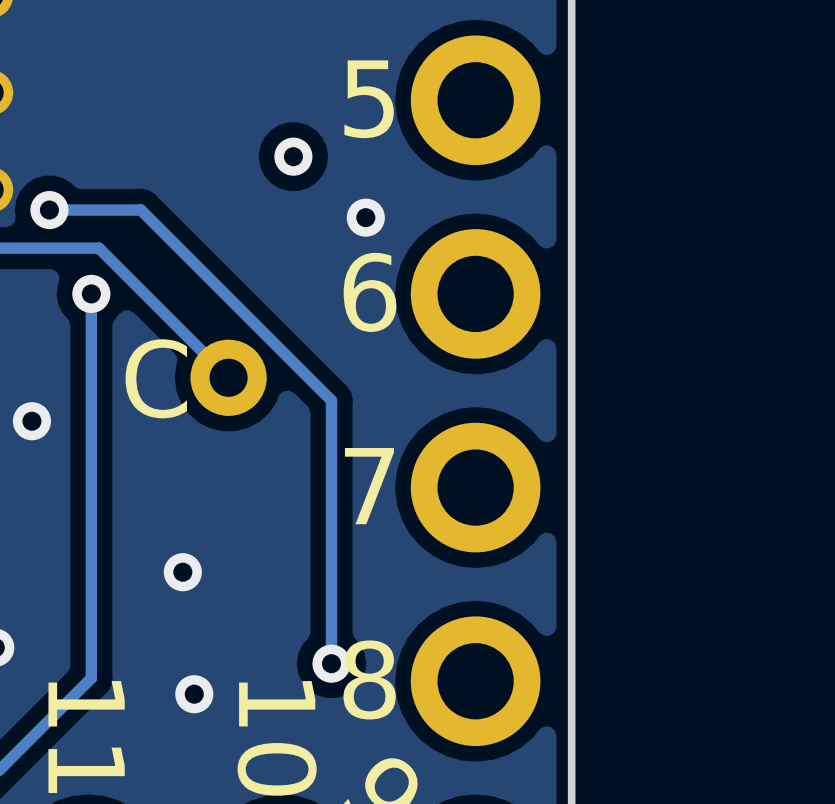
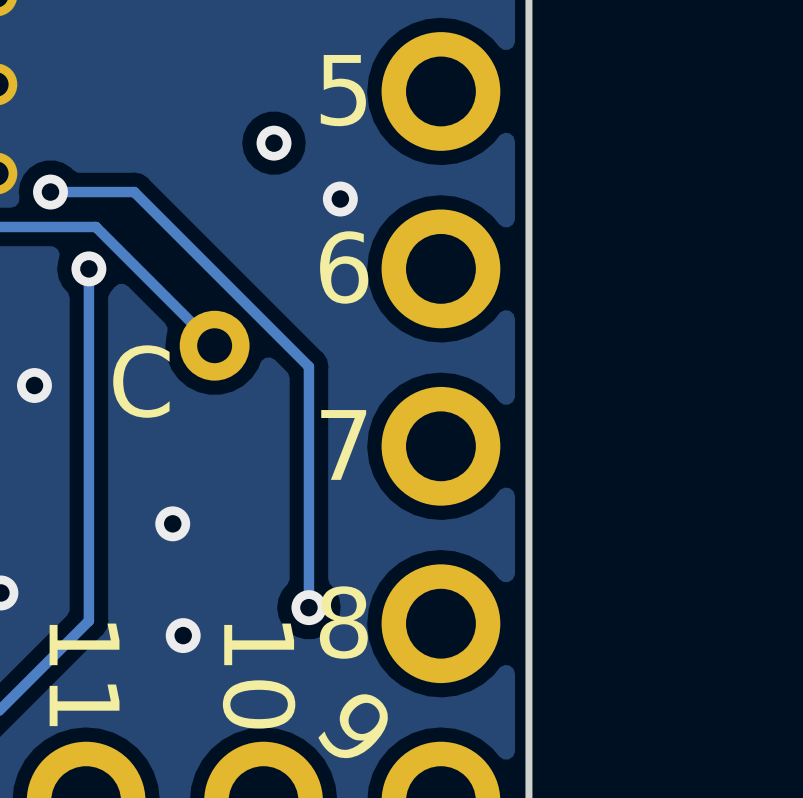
text position: C (156, 378) -> C (141, 381)

